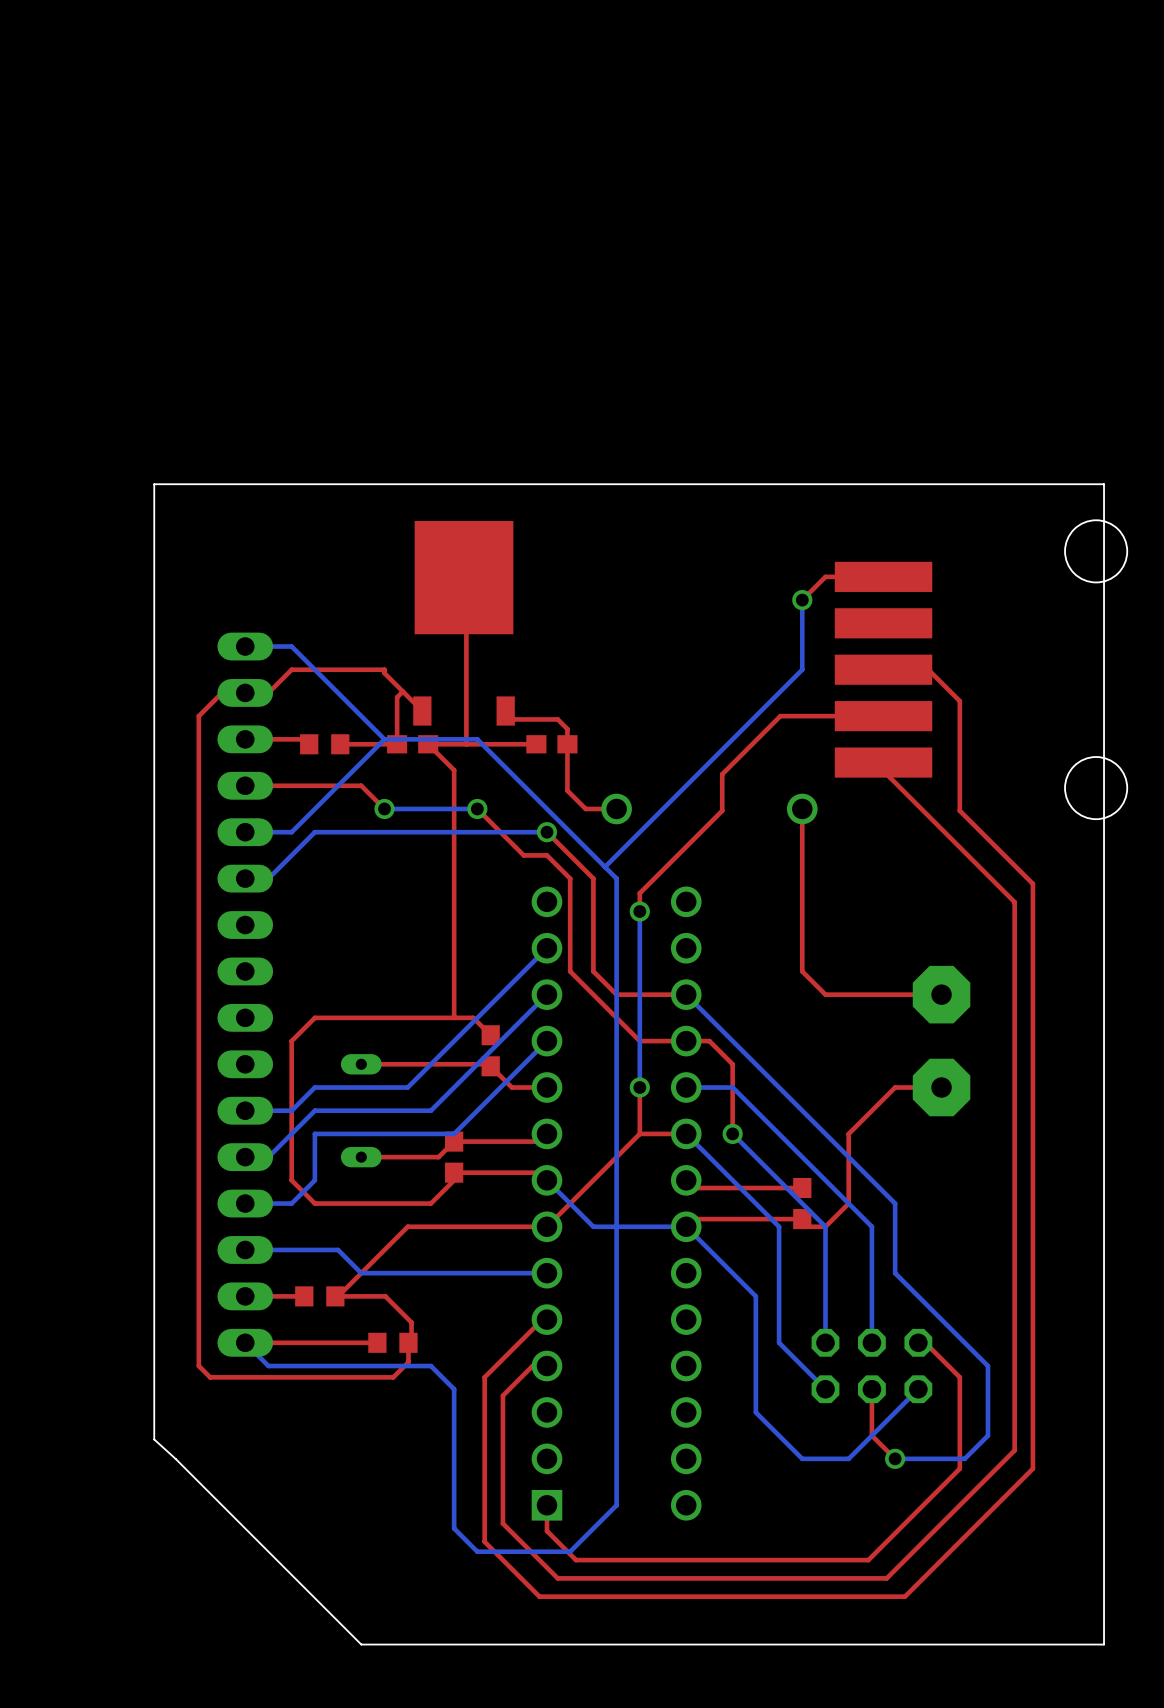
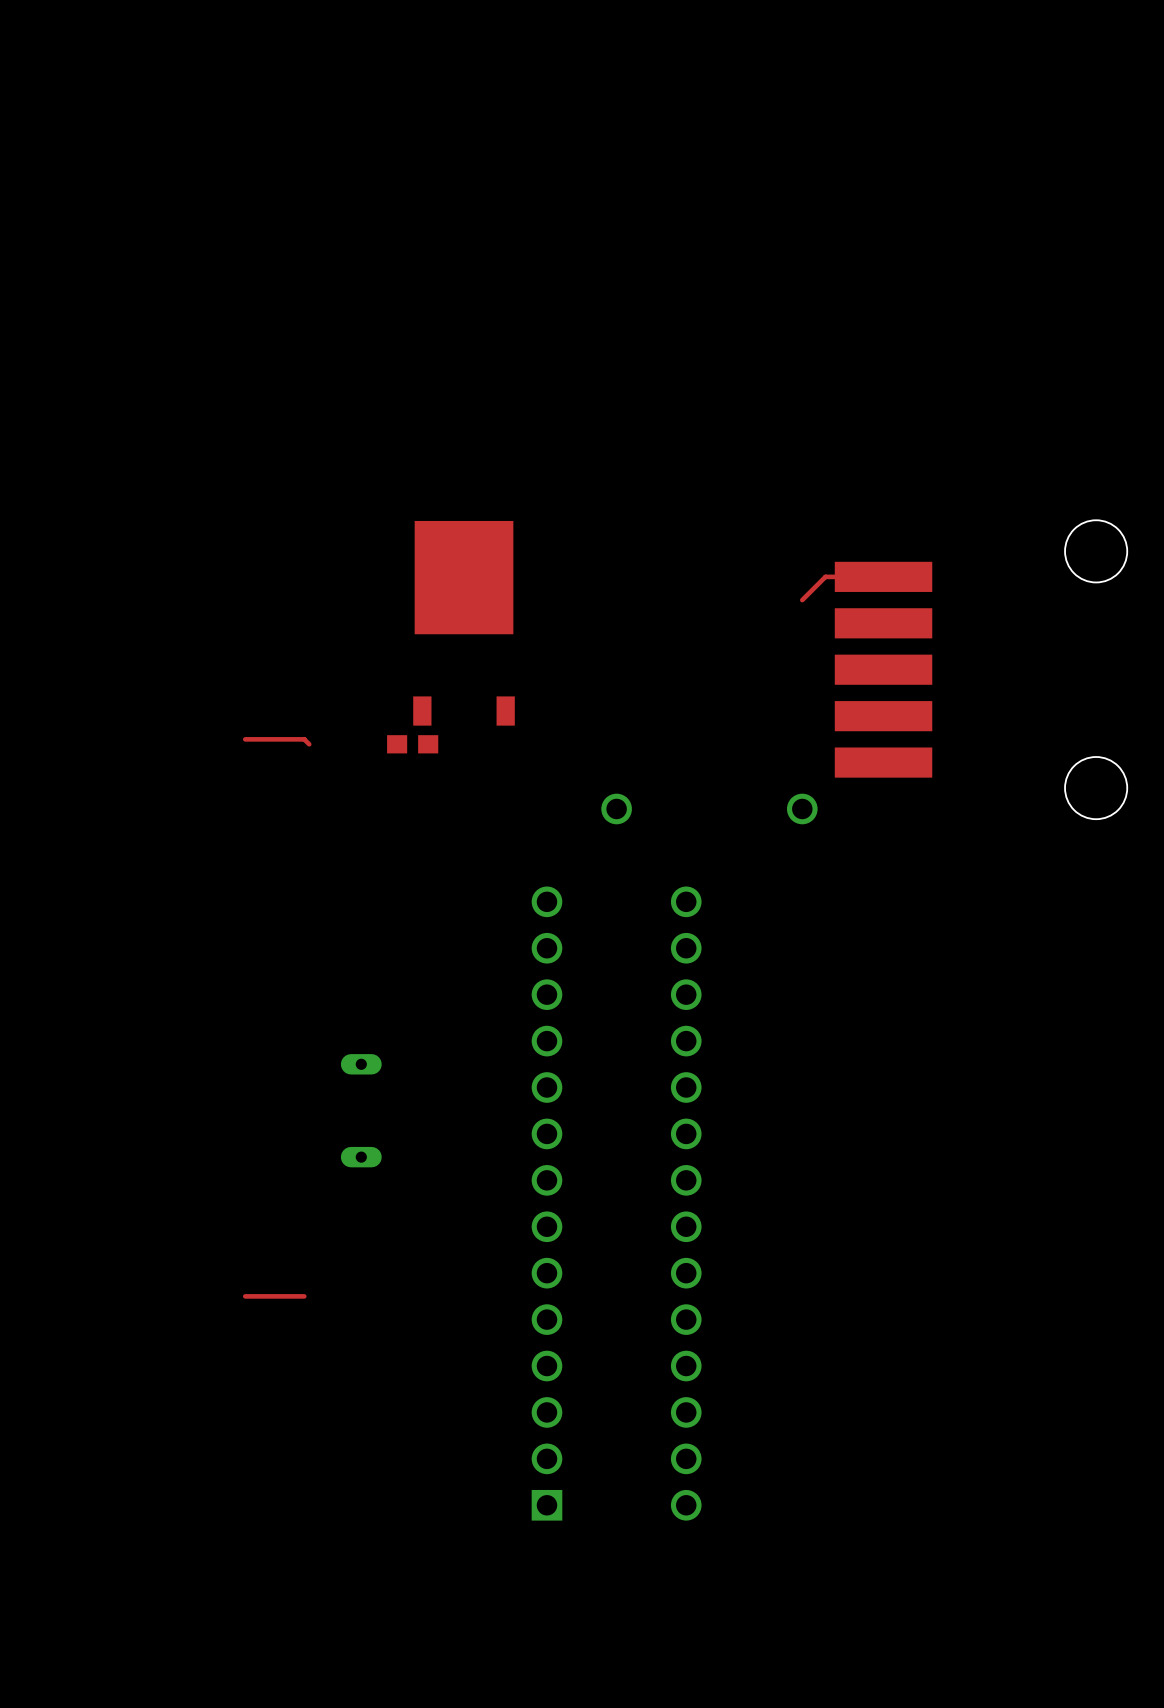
board edge: (1104, 484) (154, 484) (154, 1439) (361, 1644) (1104, 1644) (1104, 484) -> none
top track: (464, 577) (466, 561) (466, 744) -> none
bottom track: (802, 600) (802, 669) (605, 867) -> none
via: (802, 600) -> none
bottom track: (245, 646) (291, 646) (384, 739) -> none
top track: (883, 669) (888, 664) (923, 664) (959, 701) (959, 810) (1032, 883) (1032, 1468) (905, 1596) (539, 1596) (484, 1541) (484, 1377) (542, 1319) (546, 1319) -> none
top track: (402, 691) (397, 697) (397, 744) (340, 744) -> none
top track: (422, 711) (384, 673) (384, 669) (291, 669) (268, 692) (222, 692) (198, 716) (198, 1366) (210, 1377) (393, 1377) (408, 1362) (408, 1342) (411, 1339) (411, 1322) (385, 1296) (335, 1296) -> none
top track: (505, 711) (514, 719) (557, 719) (567, 729) (567, 790) (585, 808) (616, 808) -> none
top track: (883, 716) (780, 716) (722, 774) (722, 810) (639, 893) (639, 911) -> none
bottom track: (384, 739) (291, 832) (245, 832) -> none
bottom track: (384, 739) (477, 739) (616, 878) (616, 1505) (570, 1551) (477, 1551) (454, 1528) (454, 1389) (430, 1366) (268, 1366) (245, 1342) -> none
part: (324, 744) -> none
top track: (536, 744) (428, 744) (454, 770) (454, 1017) -> none
part: (551, 744) -> none
top track: (883, 762) (886, 765) (886, 774) (1014, 902) (1014, 1450) (886, 1578) (557, 1578) (502, 1523) (502, 1395) (532, 1366) (546, 1366) -> none
top track: (245, 785) (361, 785) (384, 808) -> none
via: (384, 808) -> none
top track: (477, 808) (523, 855) (546, 855) (570, 878) (570, 971) (639, 1041) (709, 1041) (732, 1064) (732, 1133) -> none
bottom track: (477, 808) (384, 808) -> none
via: (477, 808) -> none
top track: (802, 808) (802, 971) (825, 994) (941, 994) -> none
top track: (546, 832) (593, 878) (593, 971) (616, 994) (686, 994) -> none
bottom track: (546, 832) (314, 832) (268, 878) (245, 878) -> none
via: (546, 832) -> none
bottom track: (639, 911) (639, 1087) -> none
via: (639, 911) -> none
bottom track: (546, 948) (407, 1087) (314, 1087) (291, 1110) (245, 1110) -> none
part: (245, 994) -> none
bottom track: (546, 994) (430, 1110) (314, 1110) (268, 1157) (245, 1157) -> none
bottom track: (686, 994) (895, 1203) (895, 1273) (987, 1366) (987, 1435) (964, 1458) (895, 1458) -> none
top track: (490, 1035) (473, 1017) (314, 1017) (291, 1041) (291, 1180) (314, 1203) (430, 1203) (454, 1180) (454, 1172) (539, 1172) (546, 1180) -> none
bottom track: (546, 1041) (454, 1133) (314, 1133) (314, 1180) (291, 1203) (245, 1203) -> none
part: (941, 1041) -> none
part: (490, 1050) -> none
top track: (361, 1064) (488, 1064) (511, 1087) (546, 1087) -> none
top track: (639, 1087) (639, 1133) -> none
via: (639, 1087) -> none
bottom track: (686, 1087) (732, 1087) (871, 1226) (871, 1342) -> none
top track: (941, 1087) (895, 1087) (848, 1133) (848, 1203) (825, 1226) (809, 1226) (802, 1219) (693, 1219) (686, 1226) -> none
top track: (546, 1133) (539, 1141) (454, 1141) (438, 1157) (361, 1157) -> none
top track: (639, 1133) (546, 1226) (407, 1226) (338, 1296) -> none
top track: (686, 1133) (639, 1133) -> none
bottom track: (686, 1133) (779, 1226) (779, 1342) (825, 1389) -> none
bottom track: (732, 1133) (825, 1226) (825, 1342) -> none
via: (732, 1133) -> none
part: (454, 1157) -> none
bottom track: (546, 1180) (593, 1226) (686, 1226) (755, 1296) (755, 1412) (802, 1458) (848, 1458) (918, 1389) -> none
top track: (686, 1180) (693, 1188) (802, 1188) -> none
part: (802, 1203) -> none
bottom track: (245, 1249) (338, 1249) (361, 1273) (546, 1273) -> none
part: (319, 1296) -> none
top track: (377, 1342) (245, 1342) -> none
part: (392, 1342) -> none
top track: (918, 1342) (923, 1340) (959, 1377) (959, 1468) (868, 1560) (576, 1560) (546, 1531) (546, 1505) -> none
part: (871, 1366) -> none
top track: (871, 1389) (871, 1435) (895, 1458) -> none
via: (895, 1458) -> none

